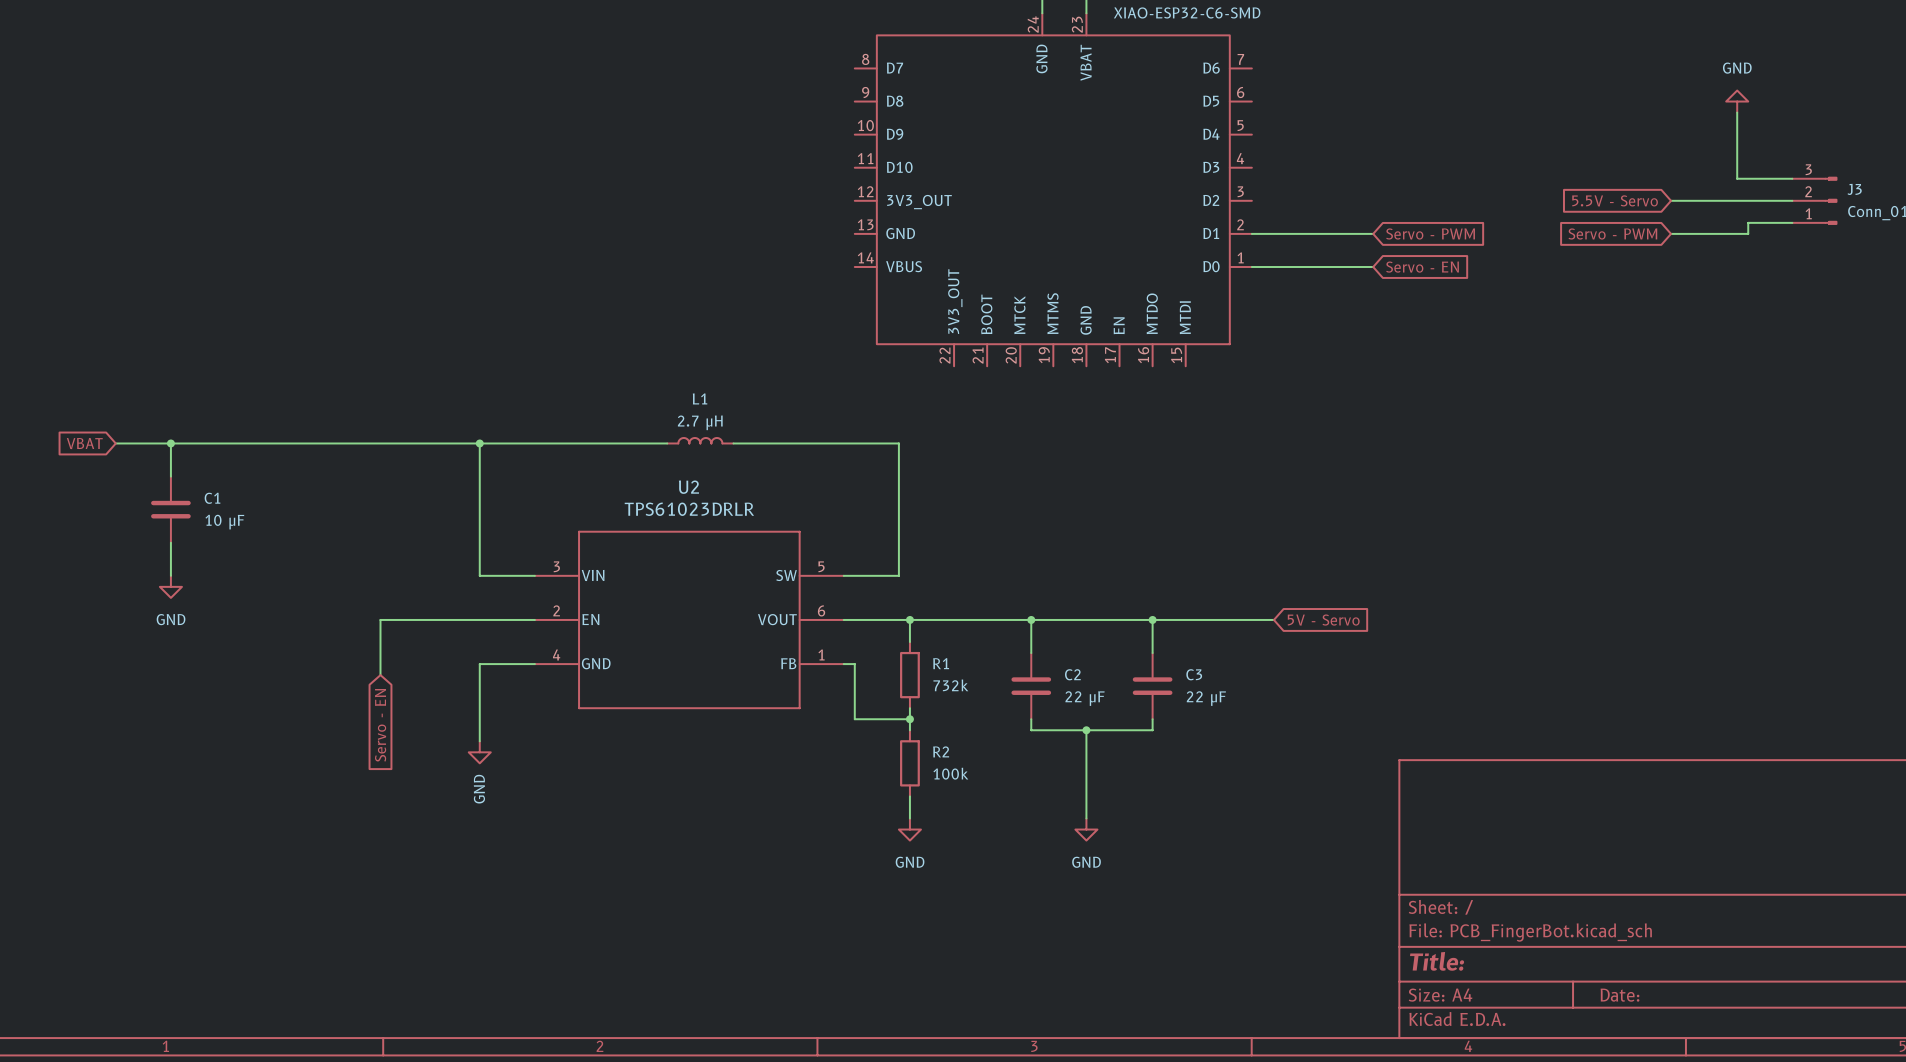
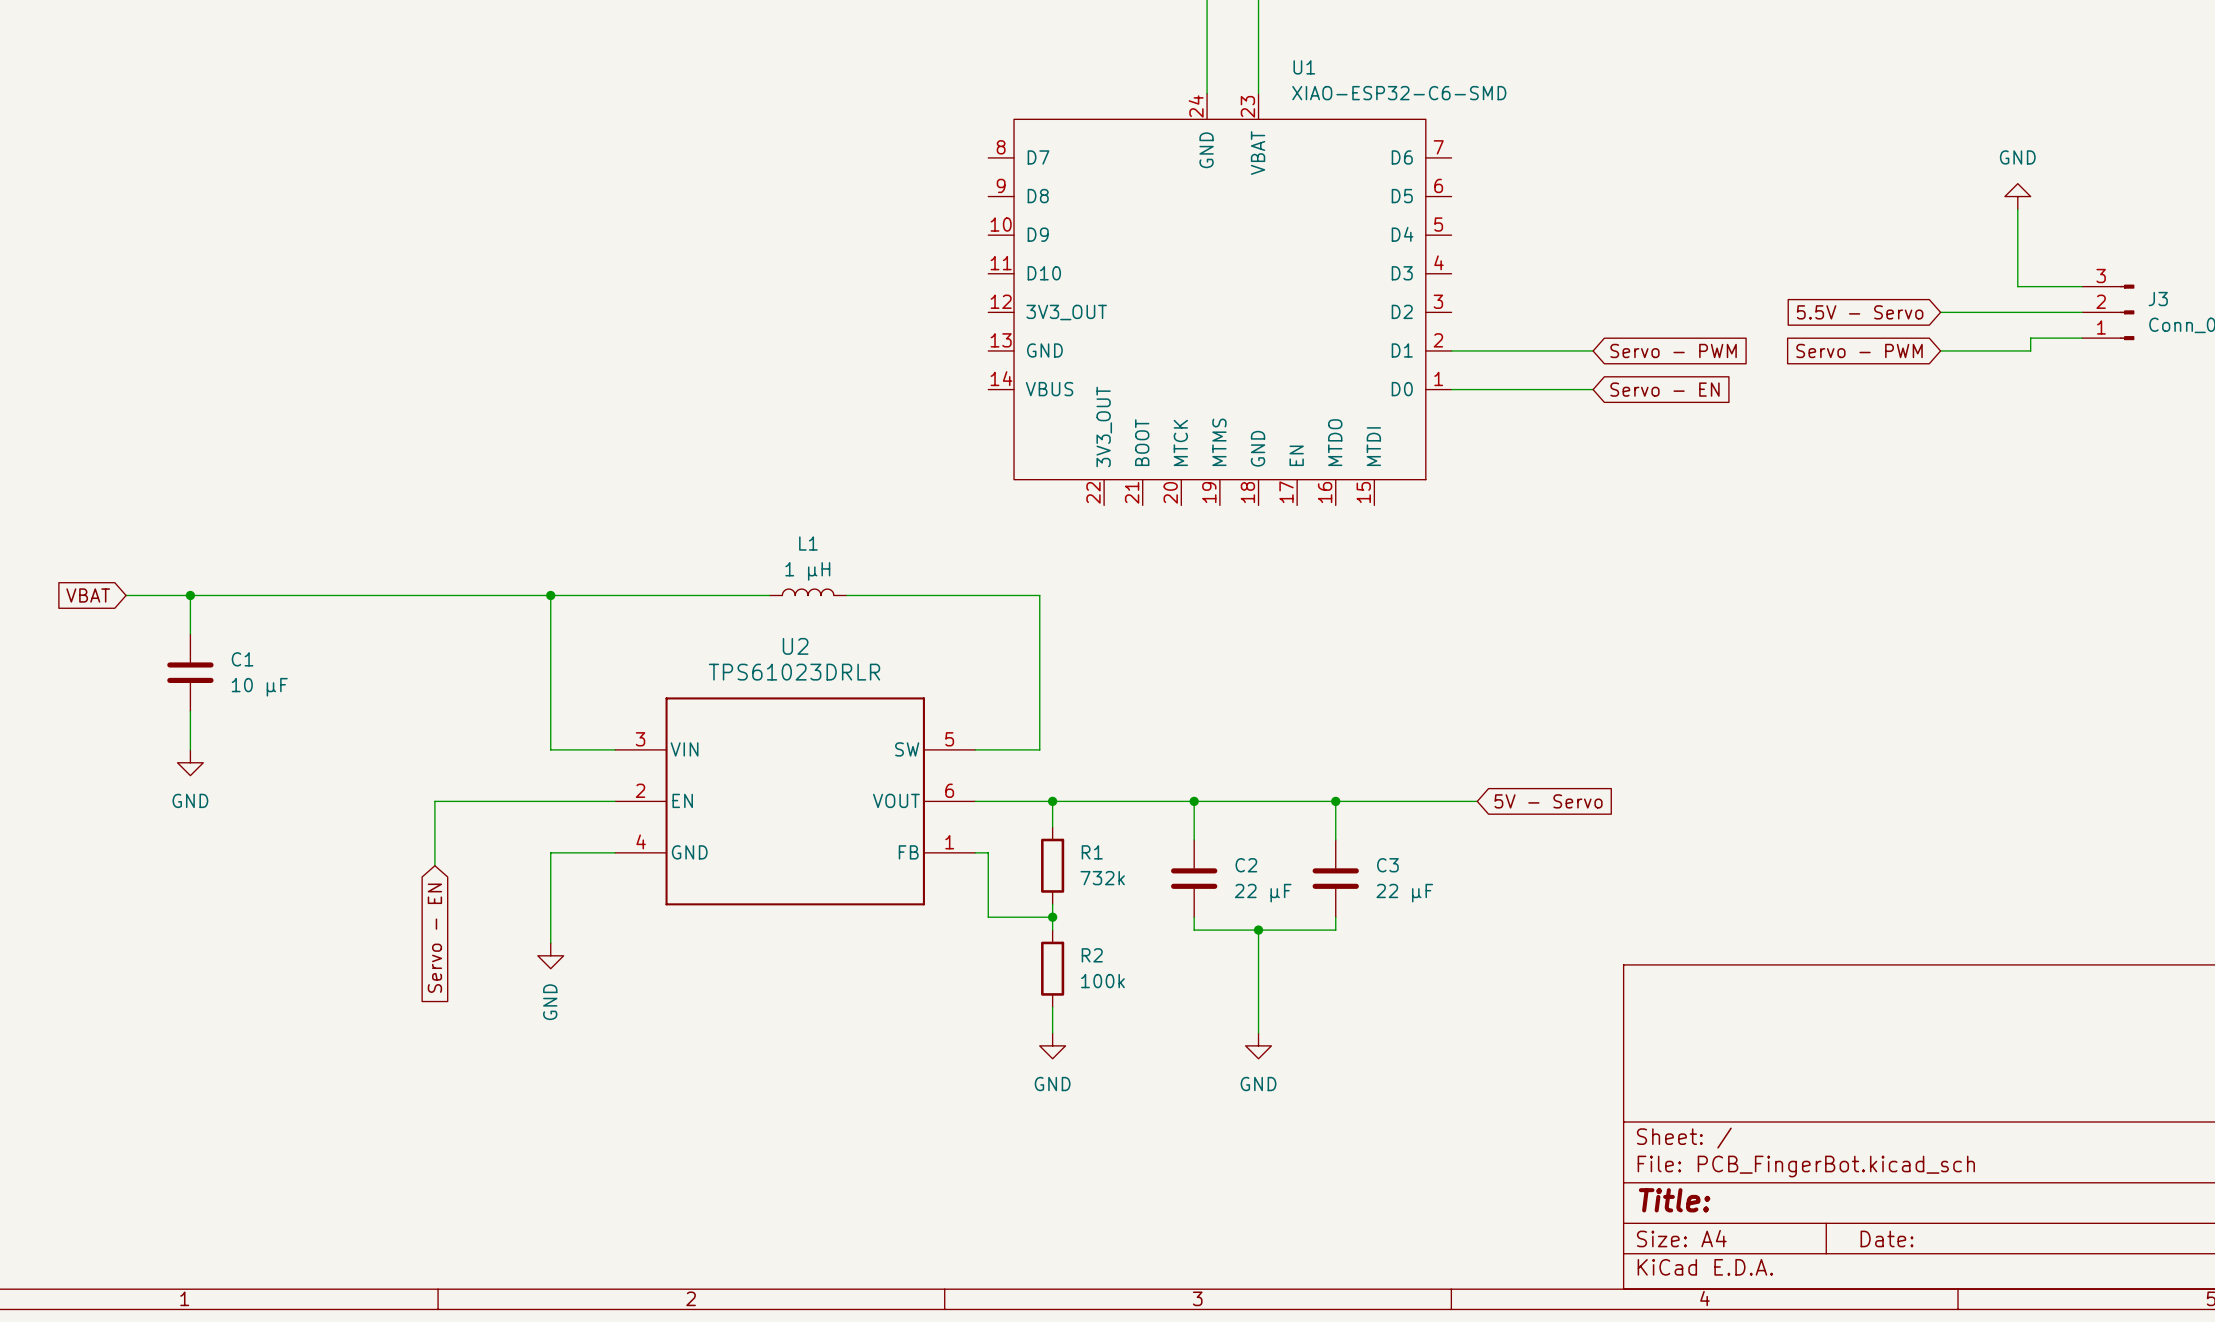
L1 value: 2.7 μH (700, 422) -> 1 μH (807, 571)

